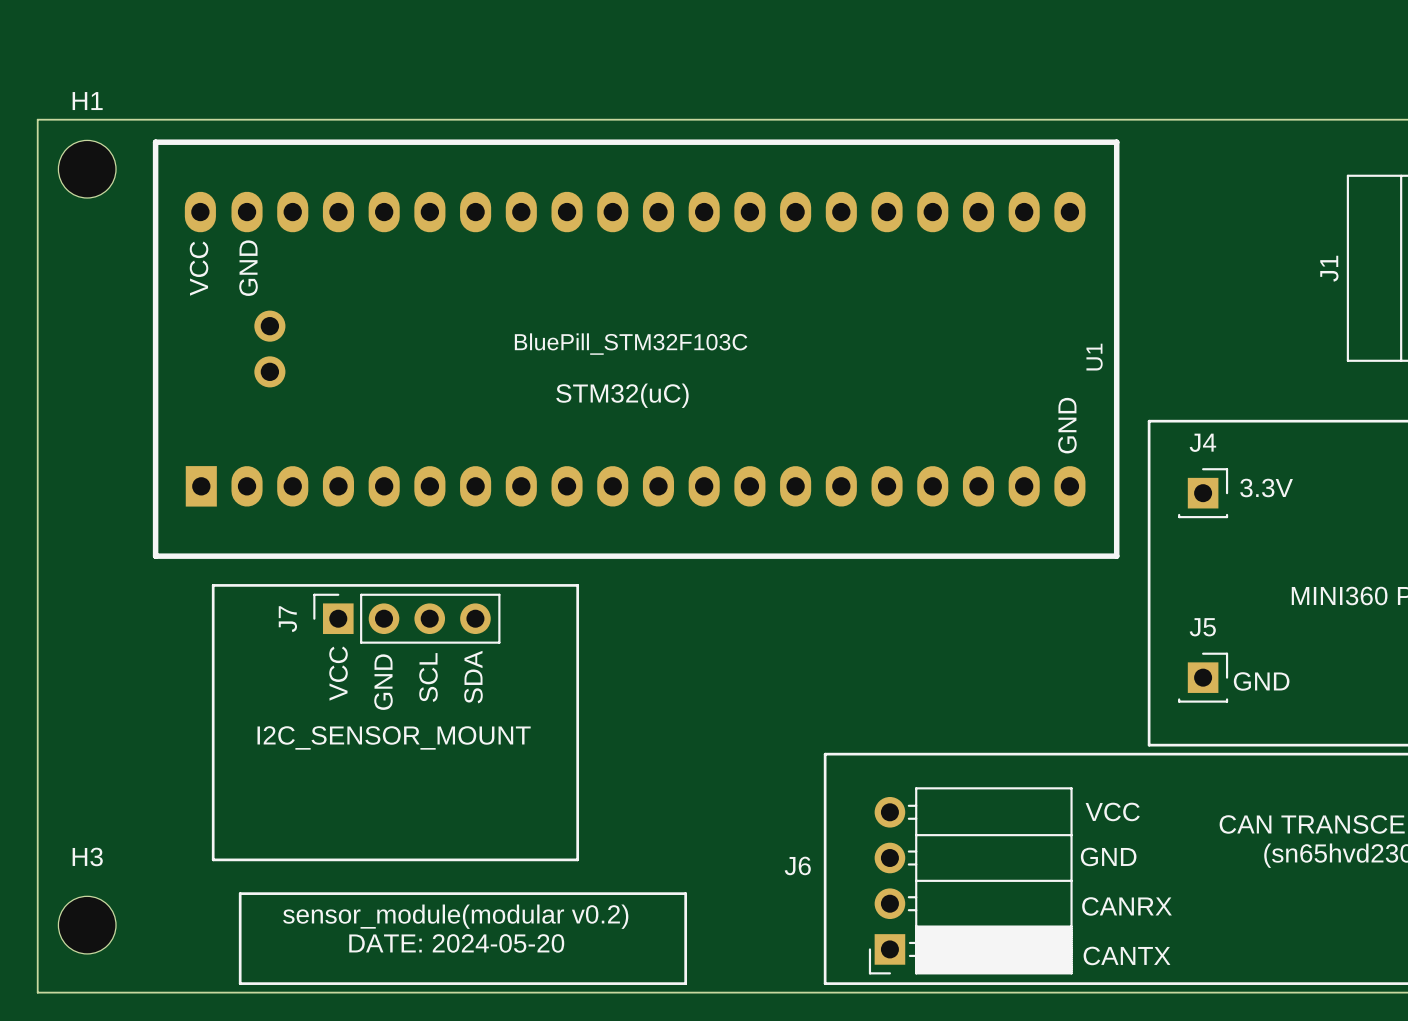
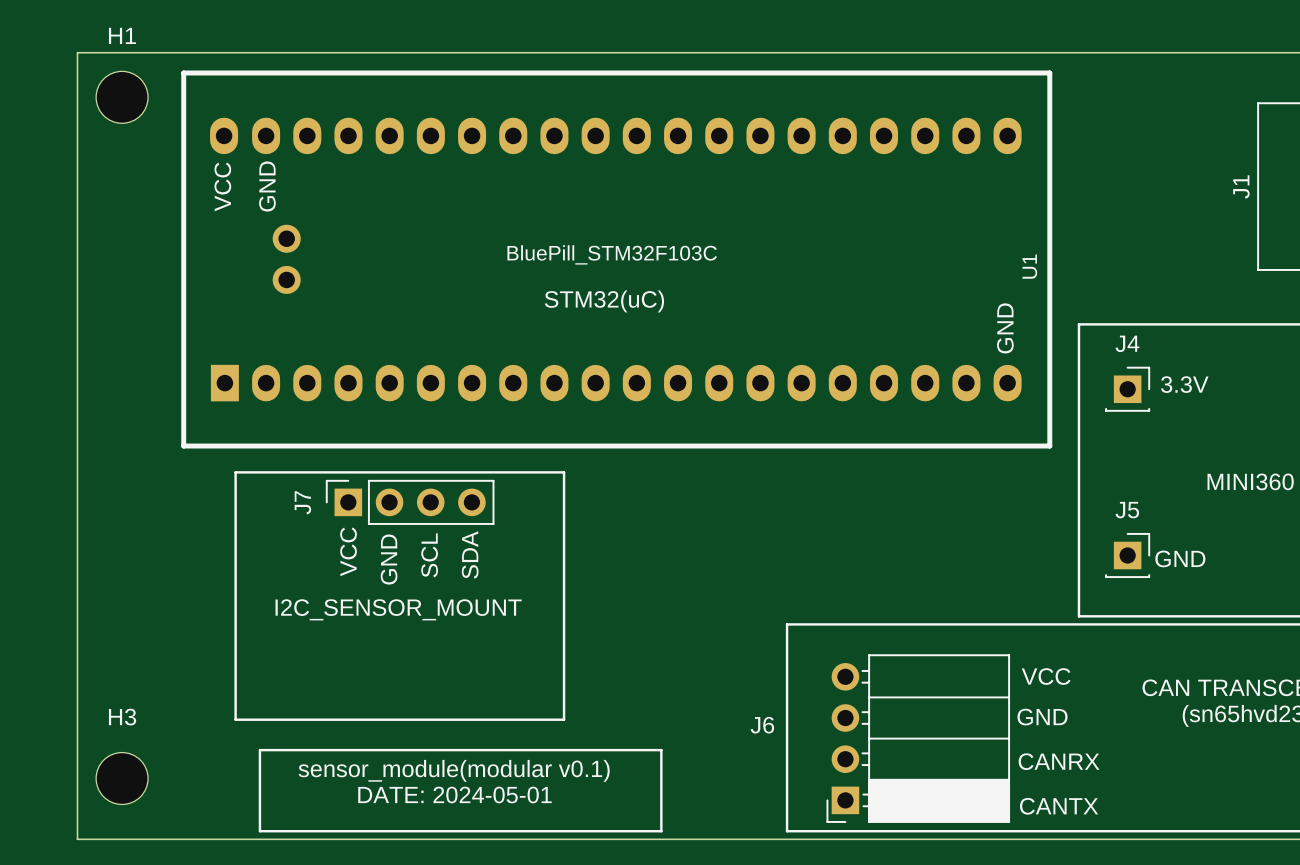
text: sensor_module(modular v0.2) (455, 916) -> sensor_module(modular v0.1) (454, 770)
text: DATE: 2024-05-20 (456, 943) -> DATE: 2024-05-01 (454, 795)

